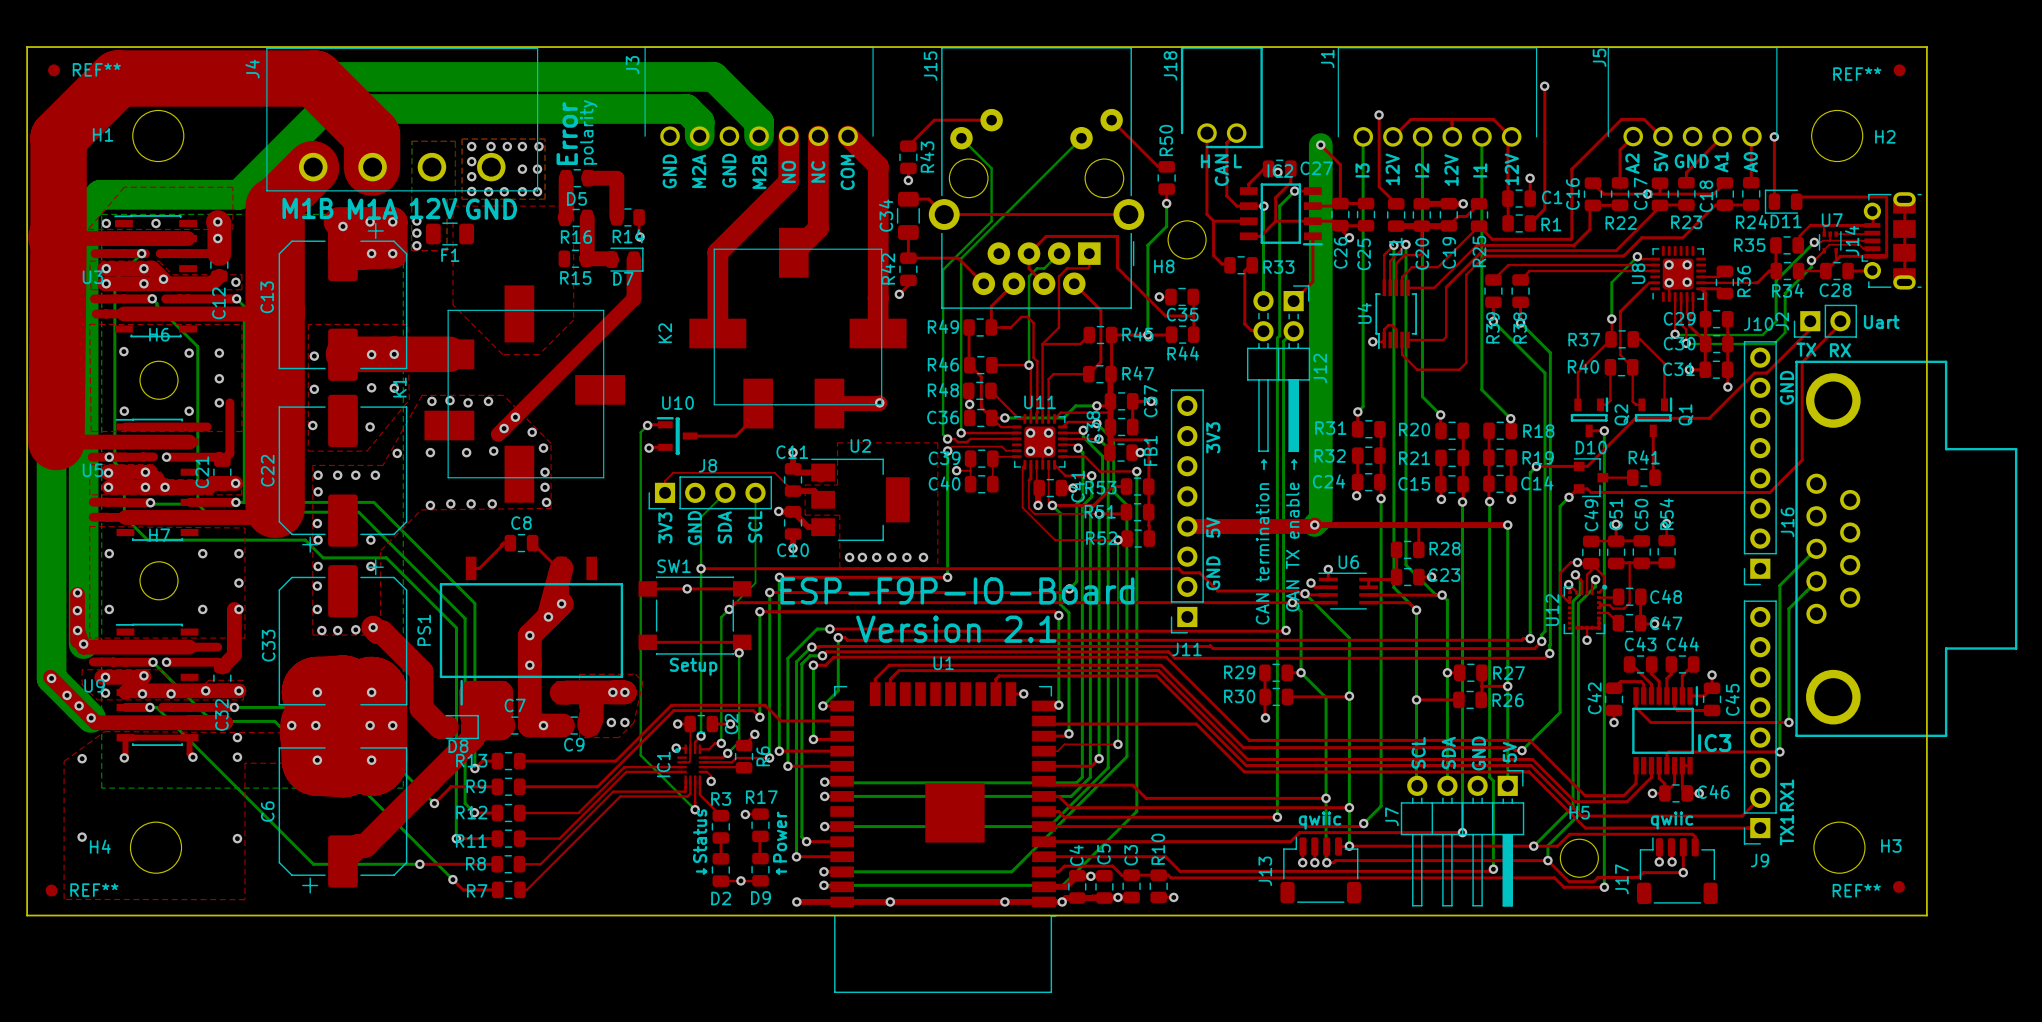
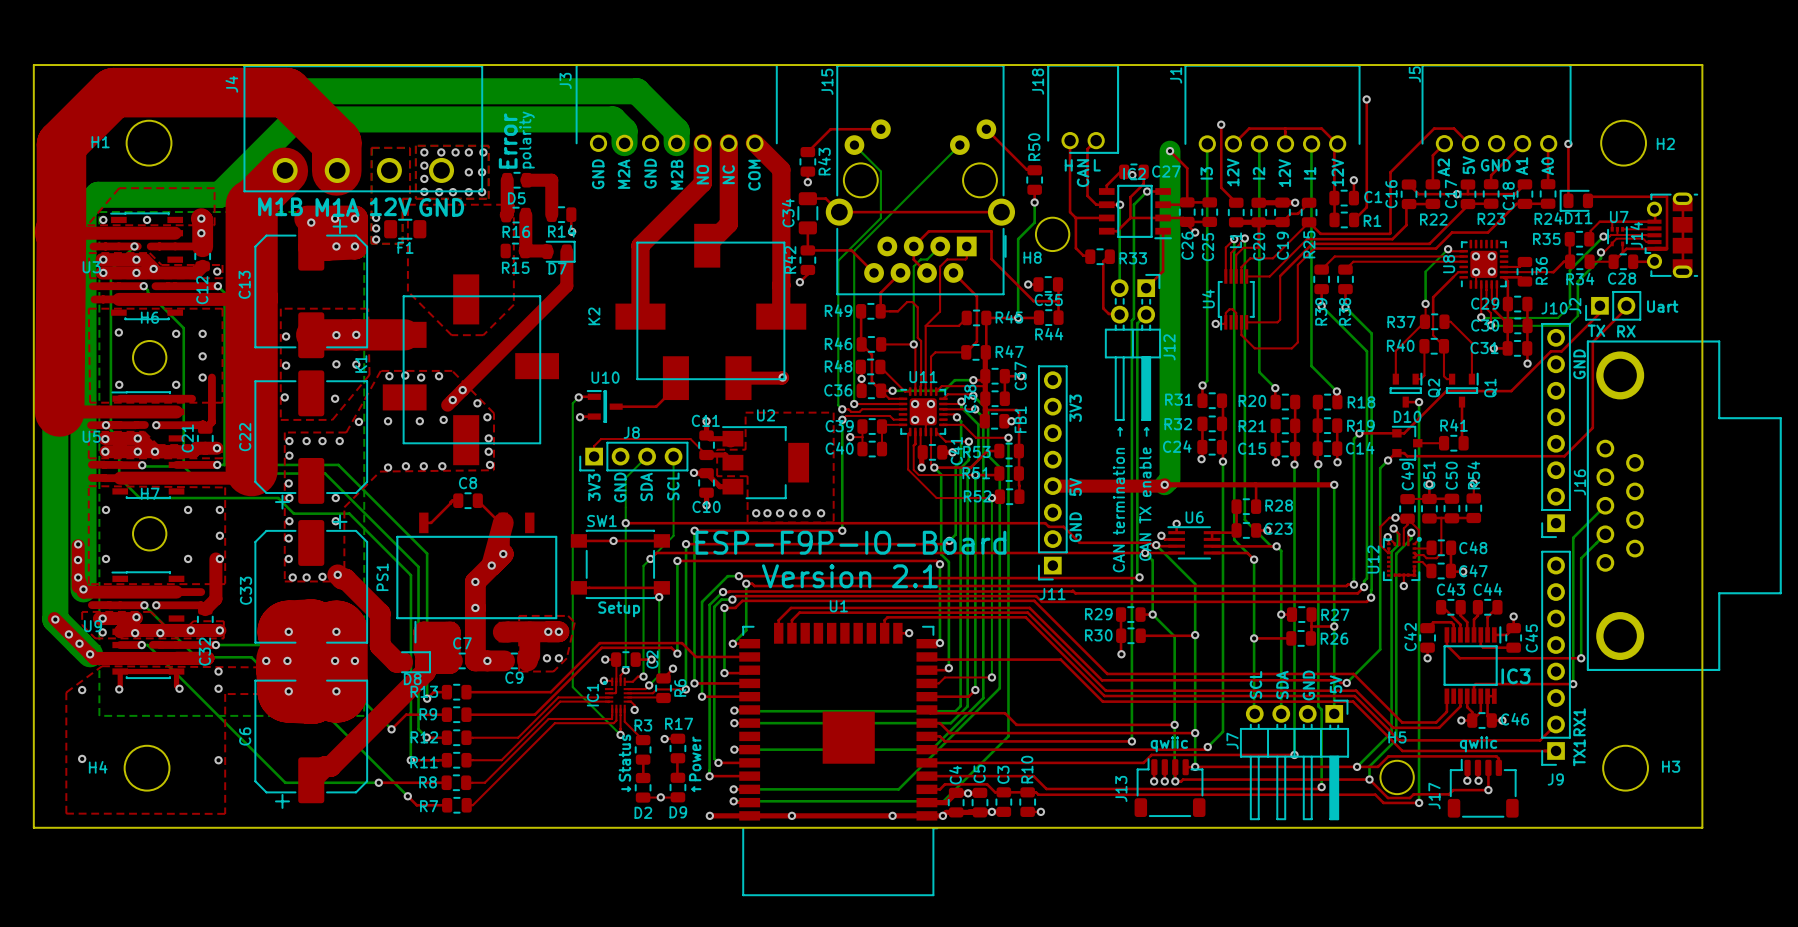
REF**: (54, 70) -> none
REF**: (1899, 70) -> none
REF**: (1898, 886) -> none
REF**: (51, 890) -> none

